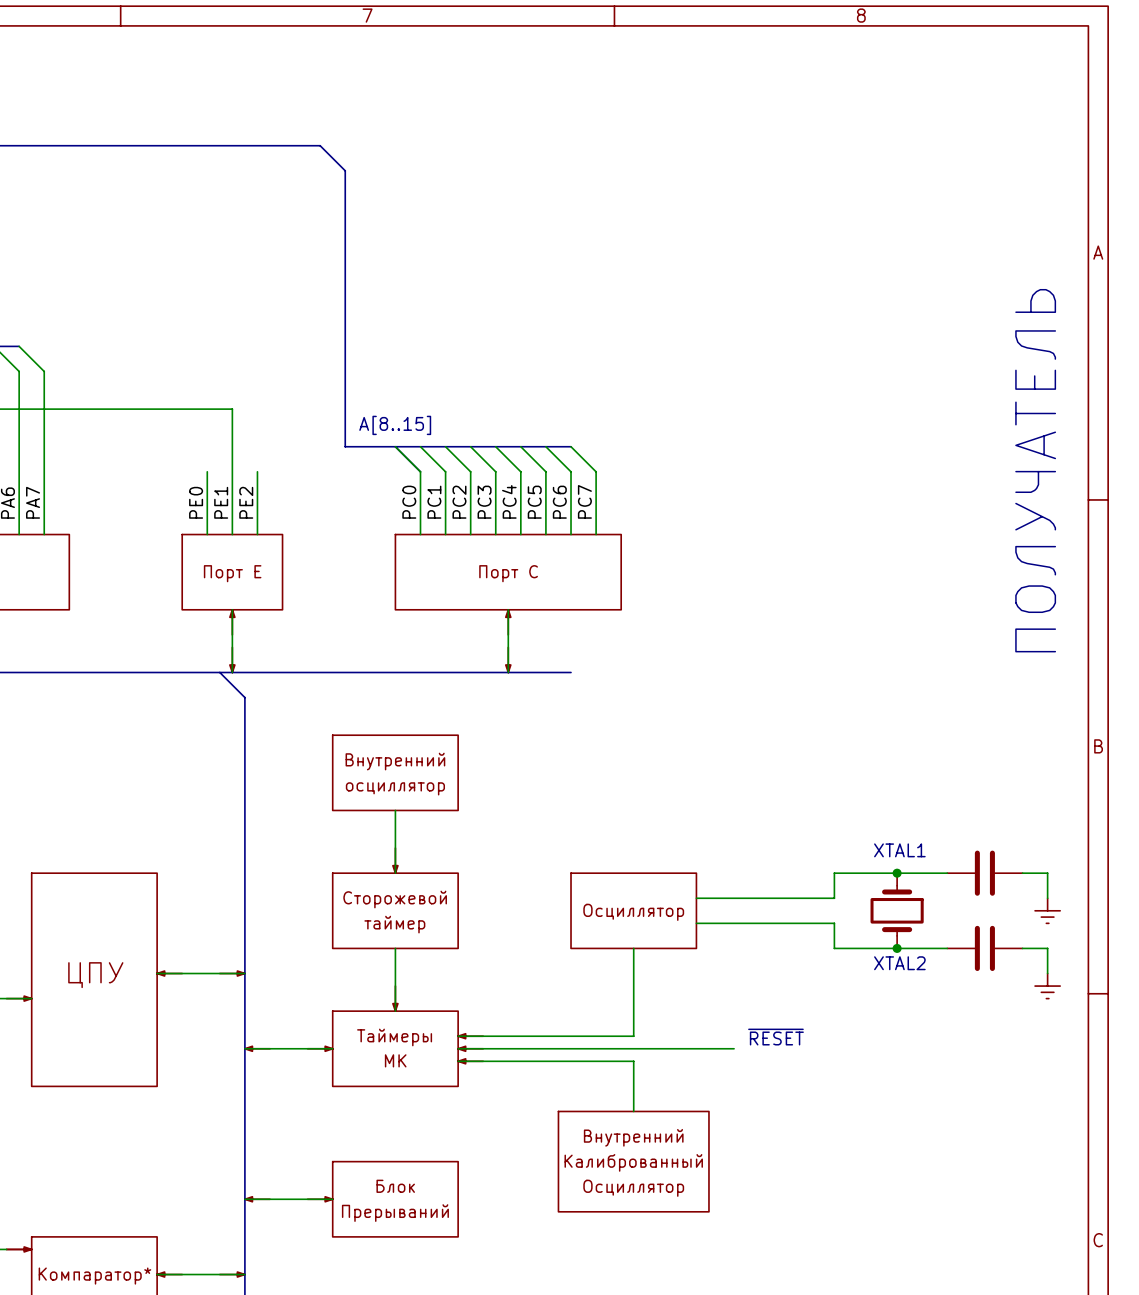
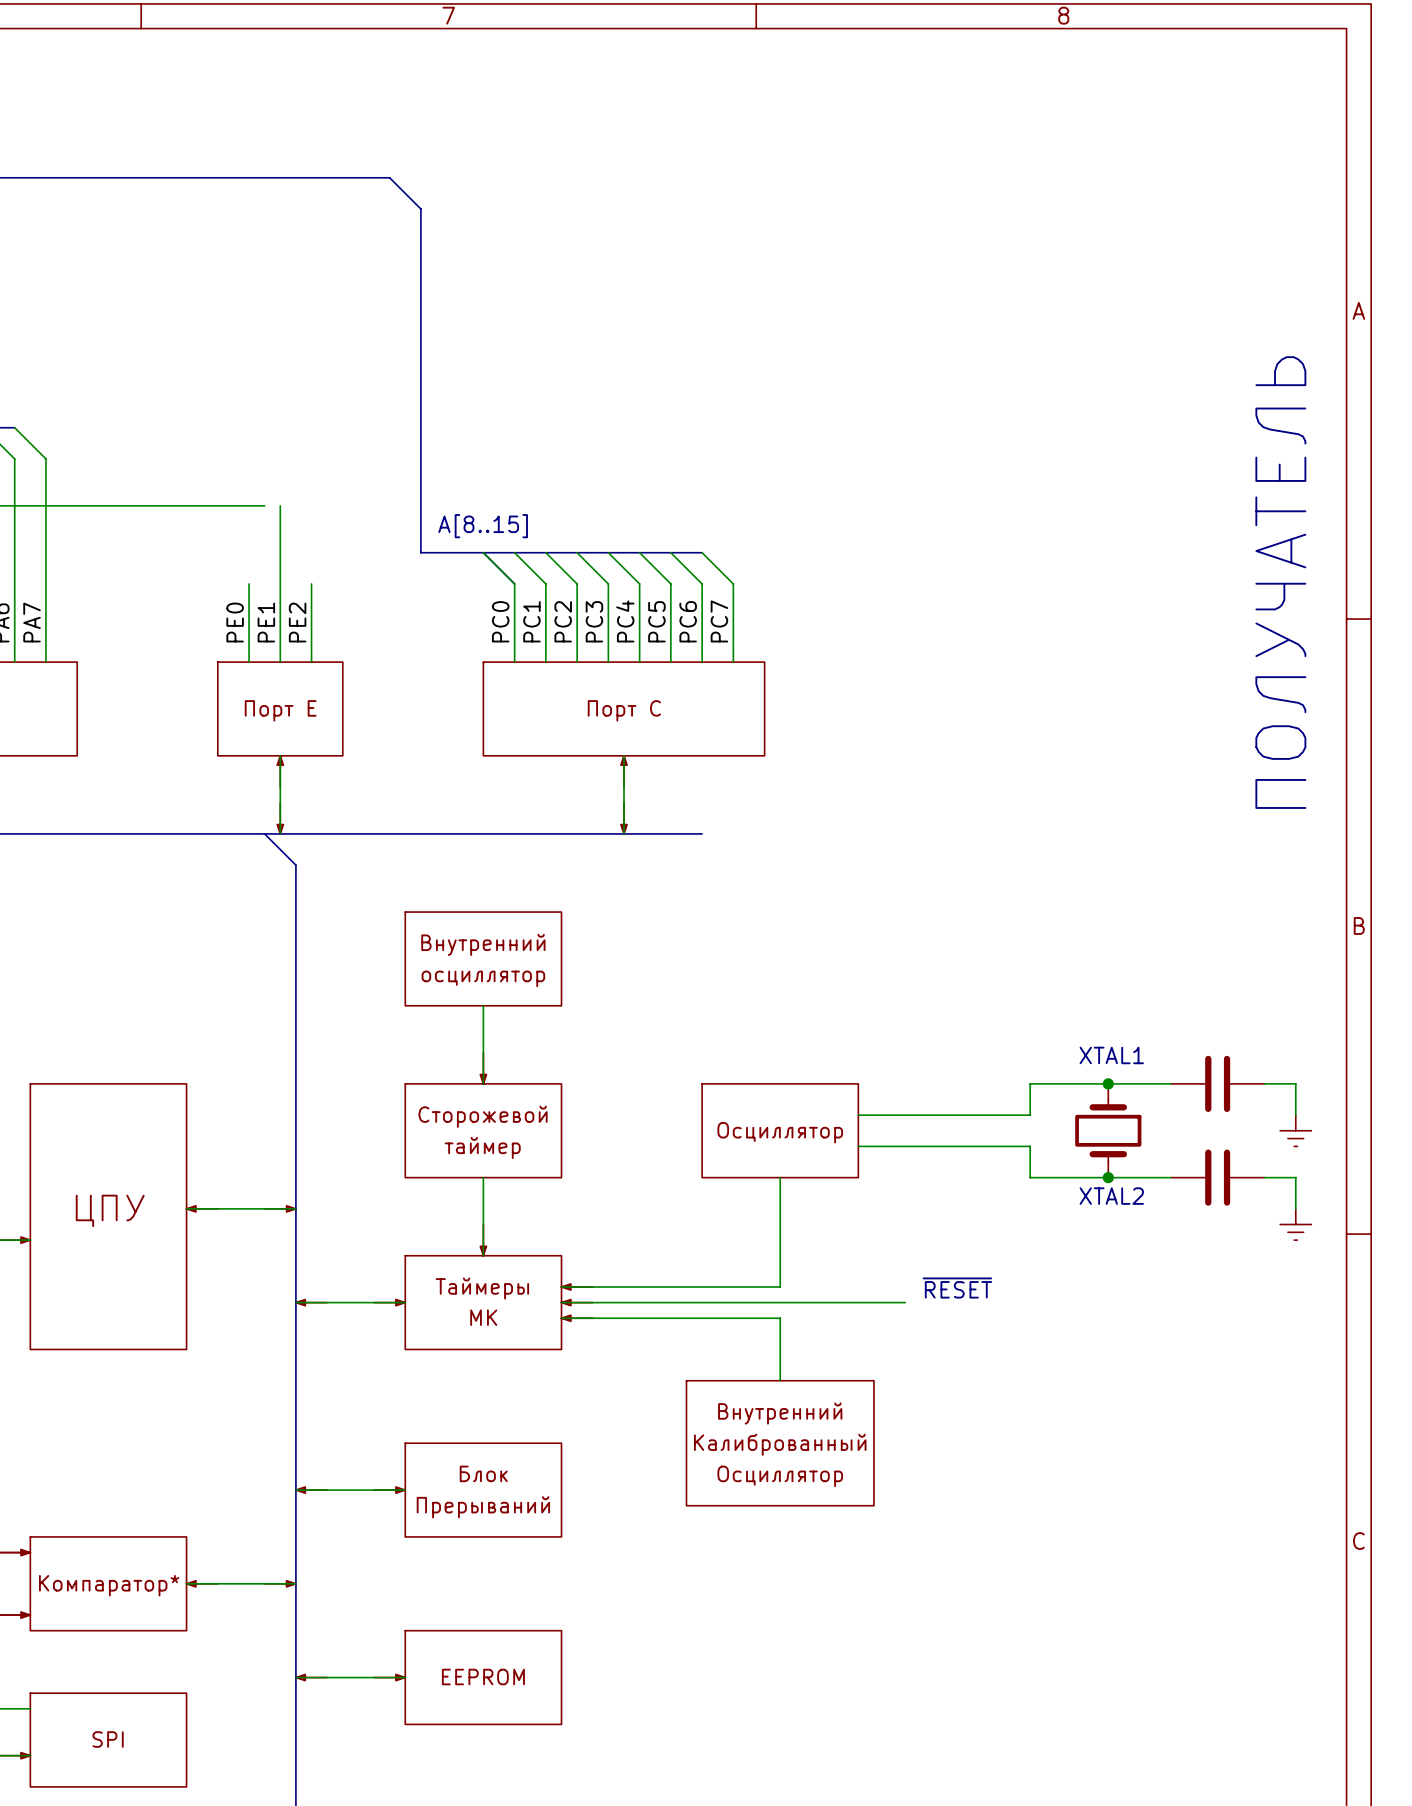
wire: (219, 409) (232, 409) -> none

